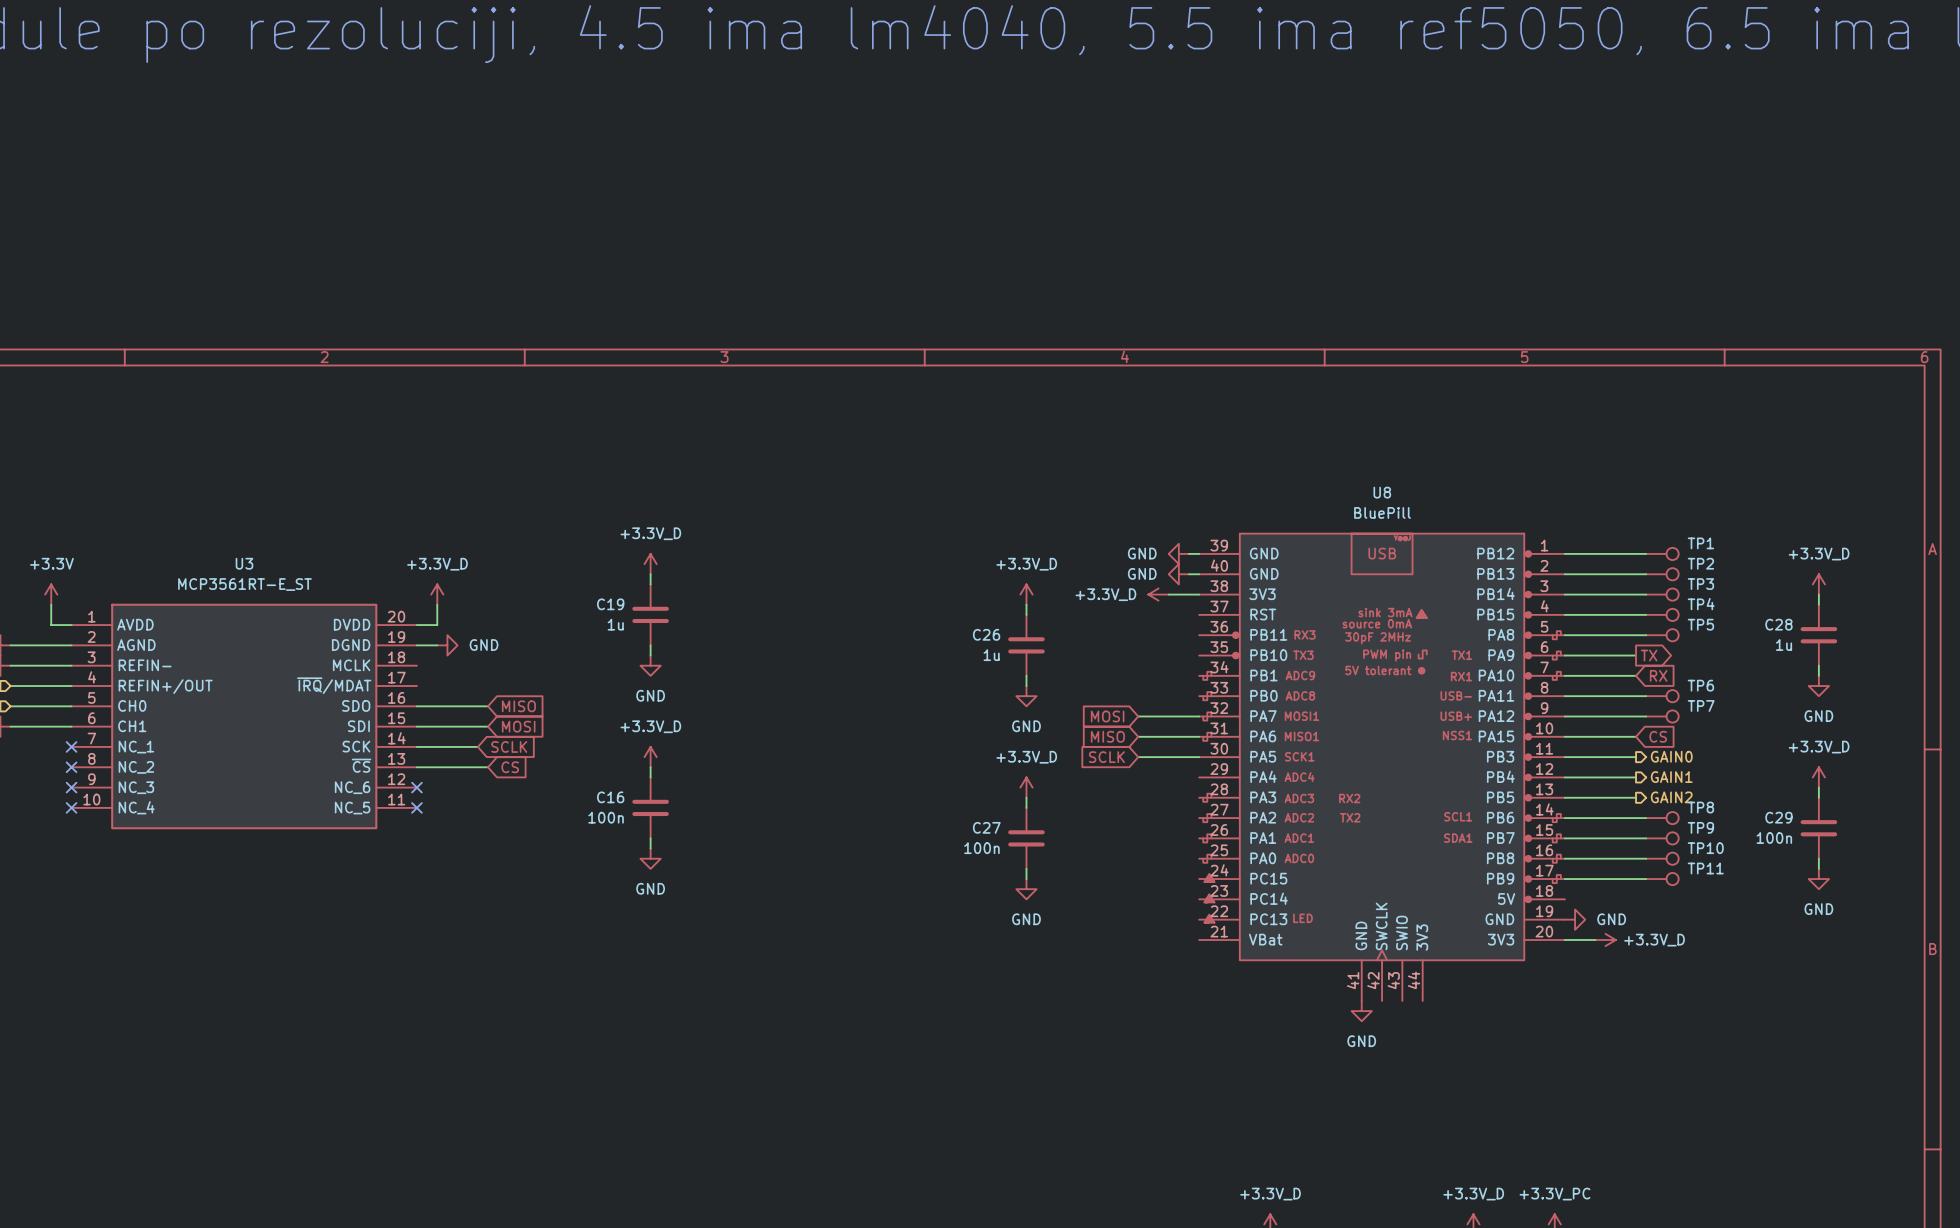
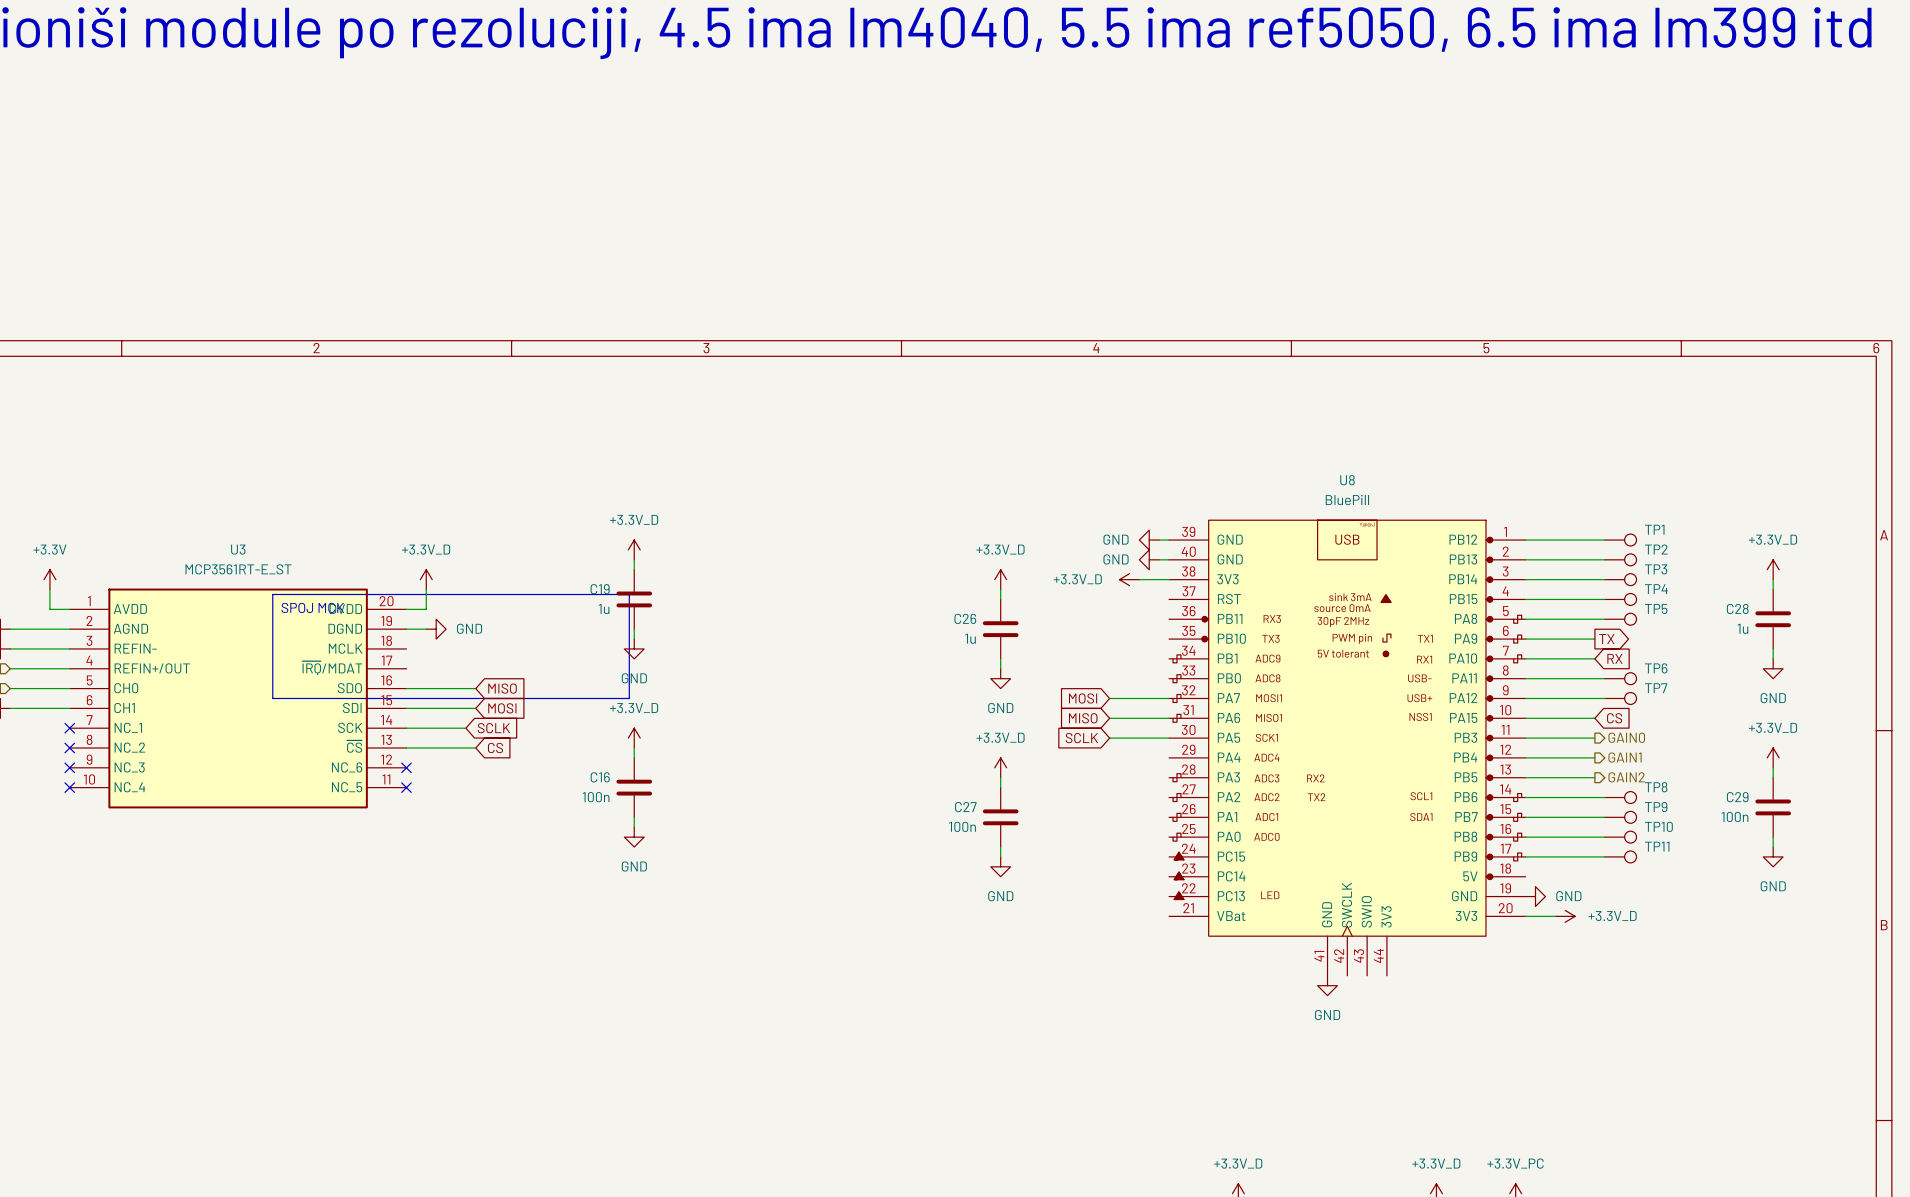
line: none -> (272, 594) (629, 594) (629, 698) (272, 698) (272, 594)
text: none -> SPOJ MCK (312, 607)

